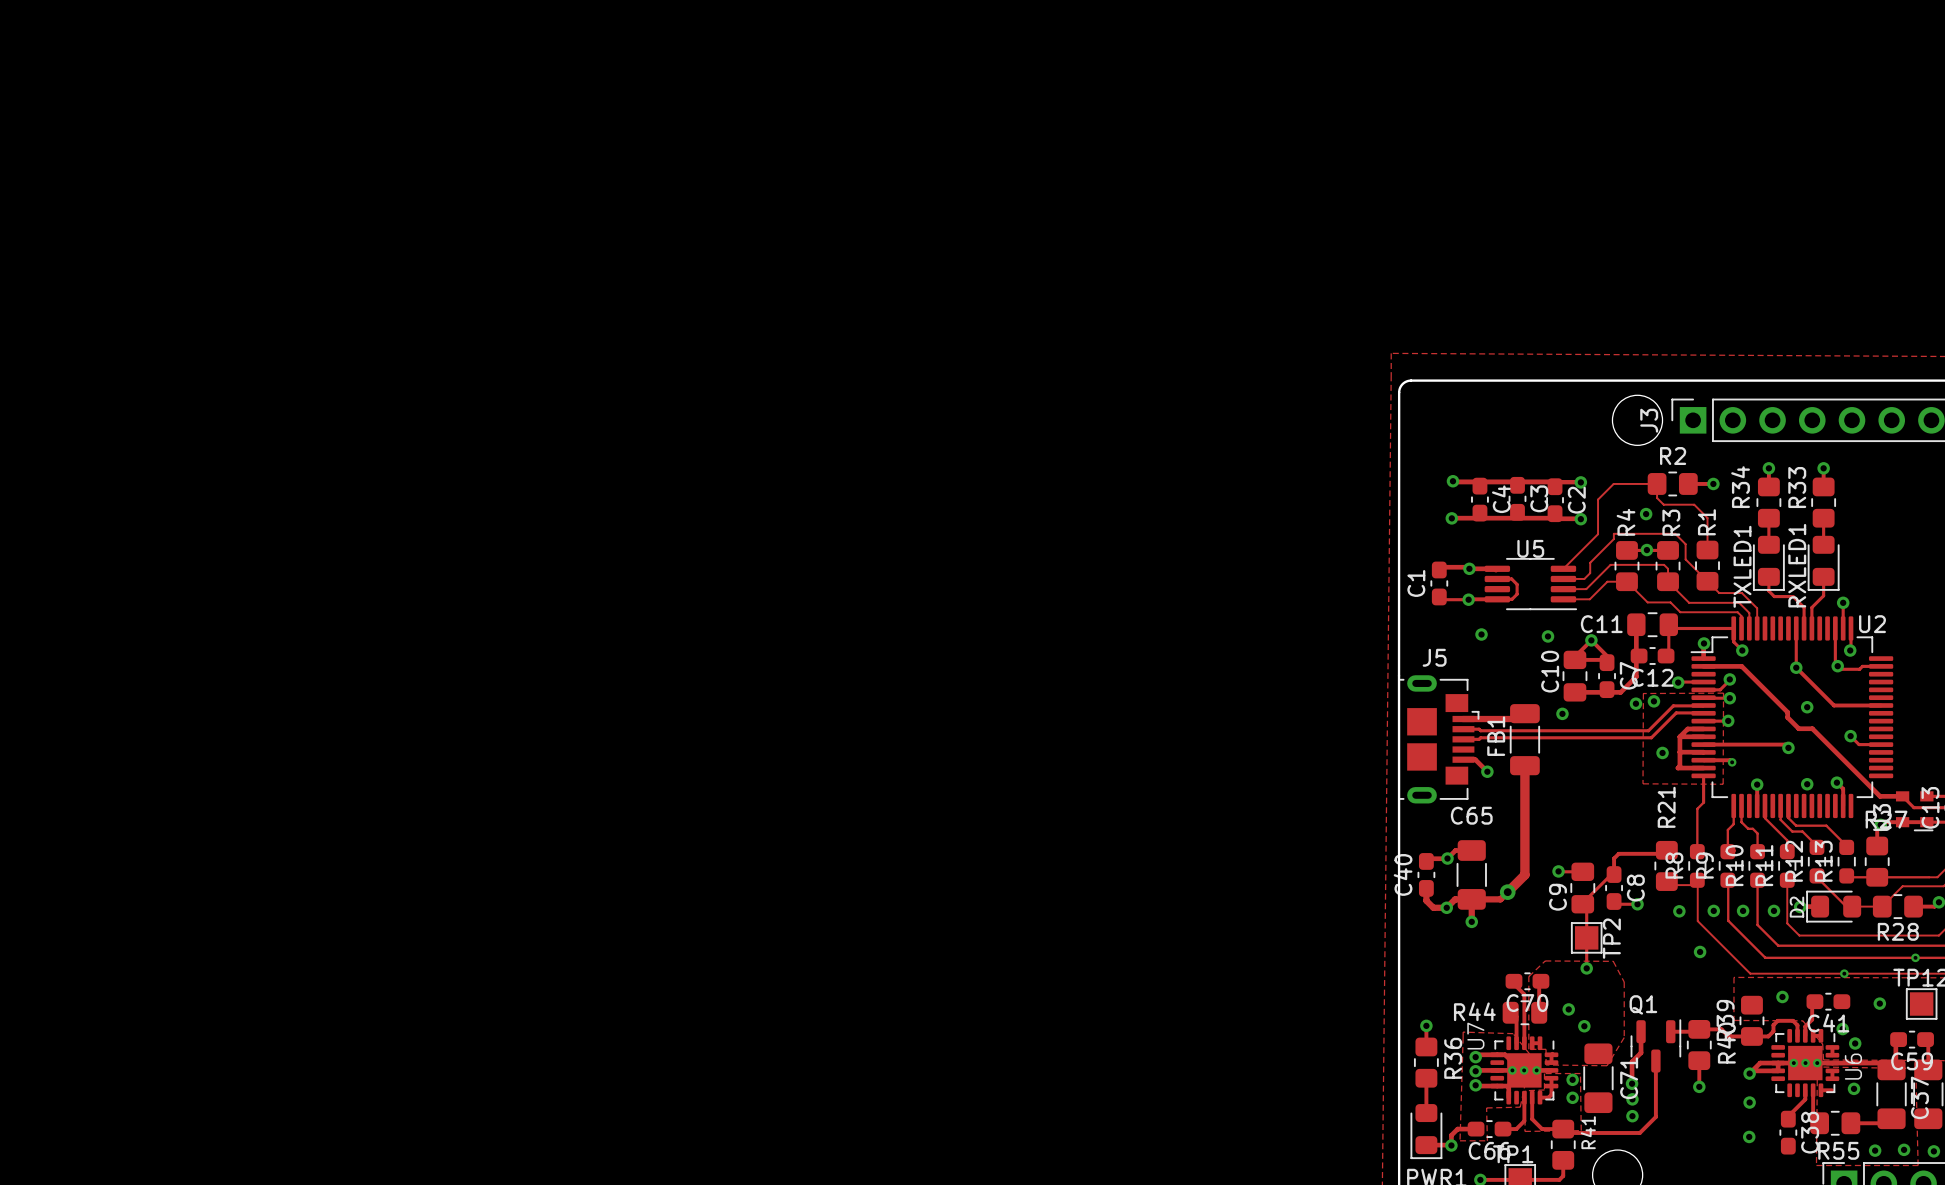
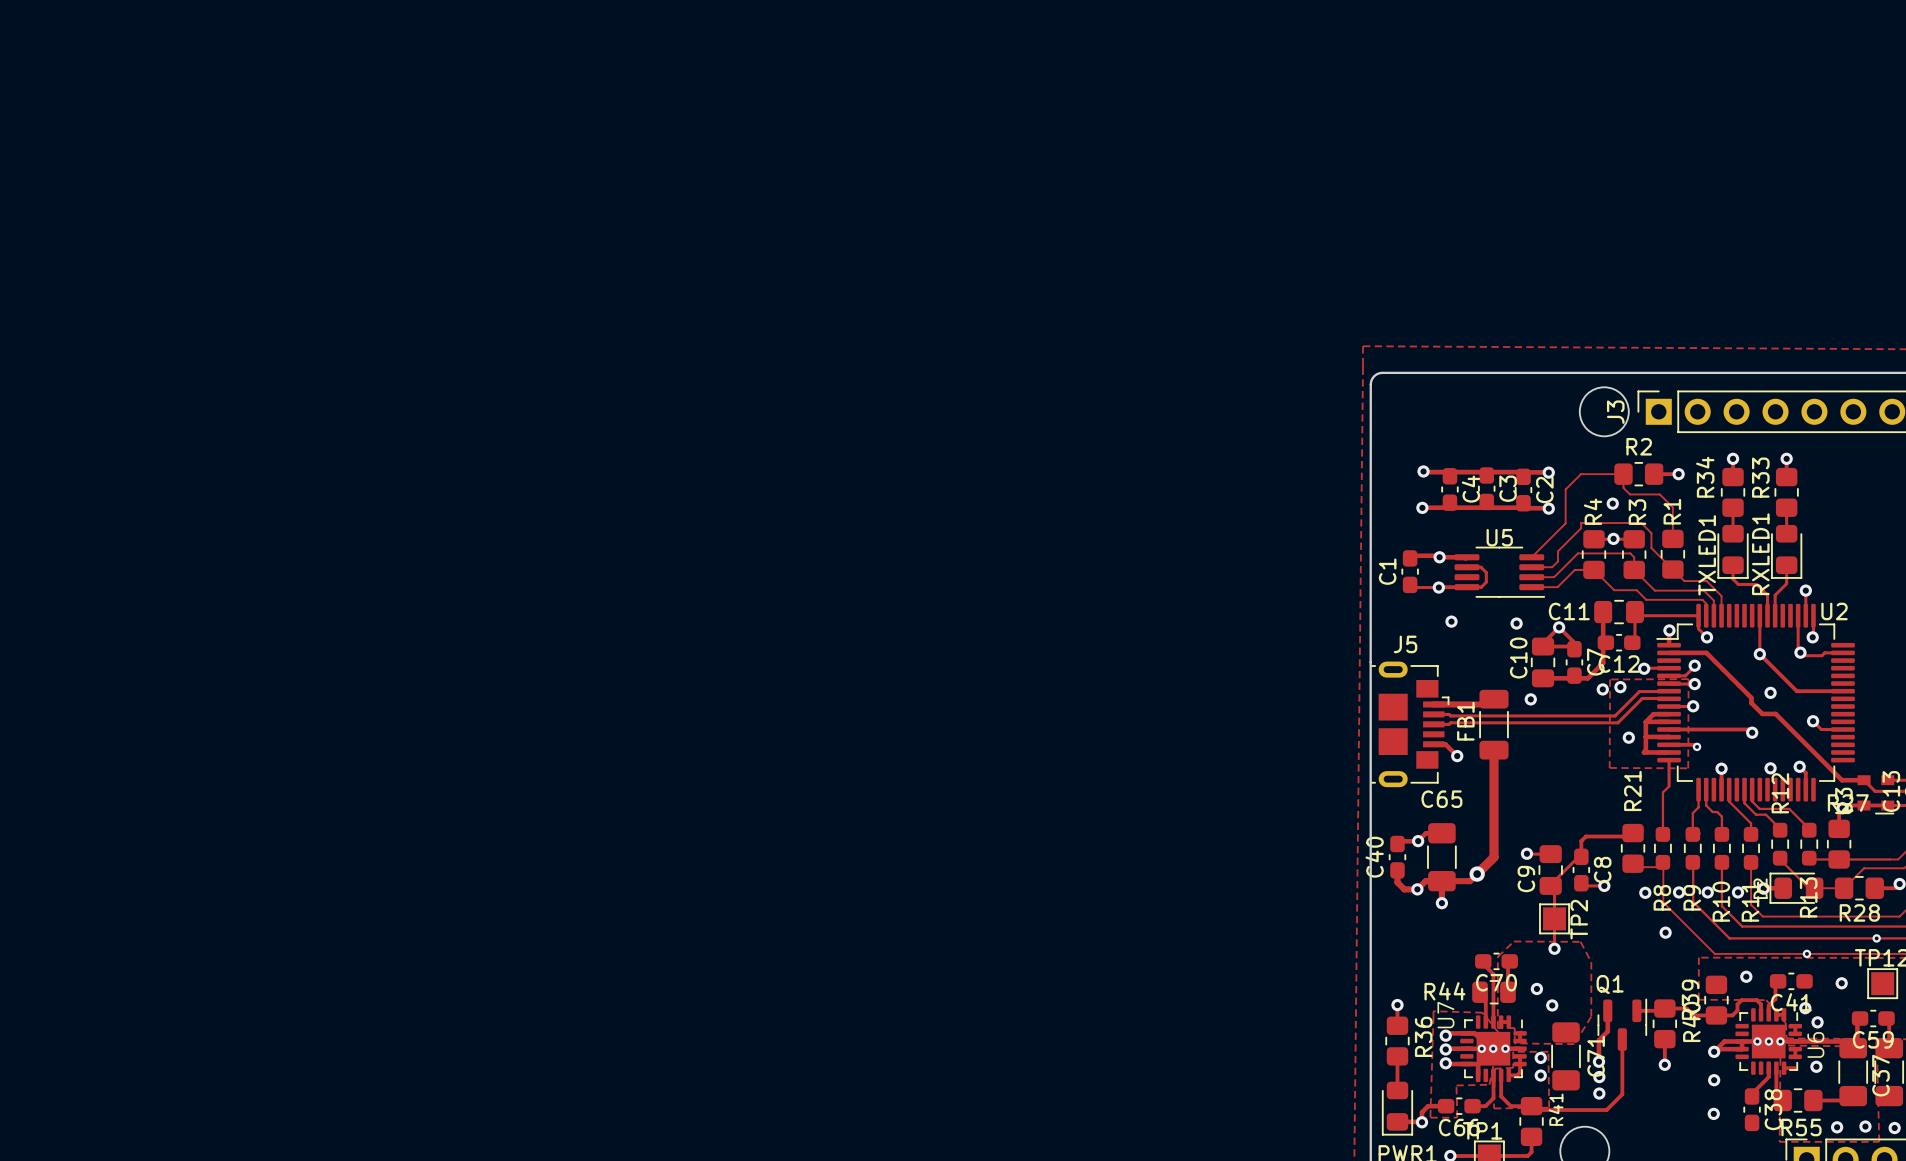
R12 name position: R12 (1794, 861) -> R12 (1780, 793)
R13 name position: R13 (1823, 861) -> R13 (1808, 897)
R8 name position: R8 (1674, 865) -> R8 (1662, 897)
R9 name position: R9 (1704, 865) -> R9 (1692, 897)
R10 name position: R10 (1734, 865) -> R10 (1721, 901)
R11 name position: R11 (1764, 865) -> R11 (1750, 901)

